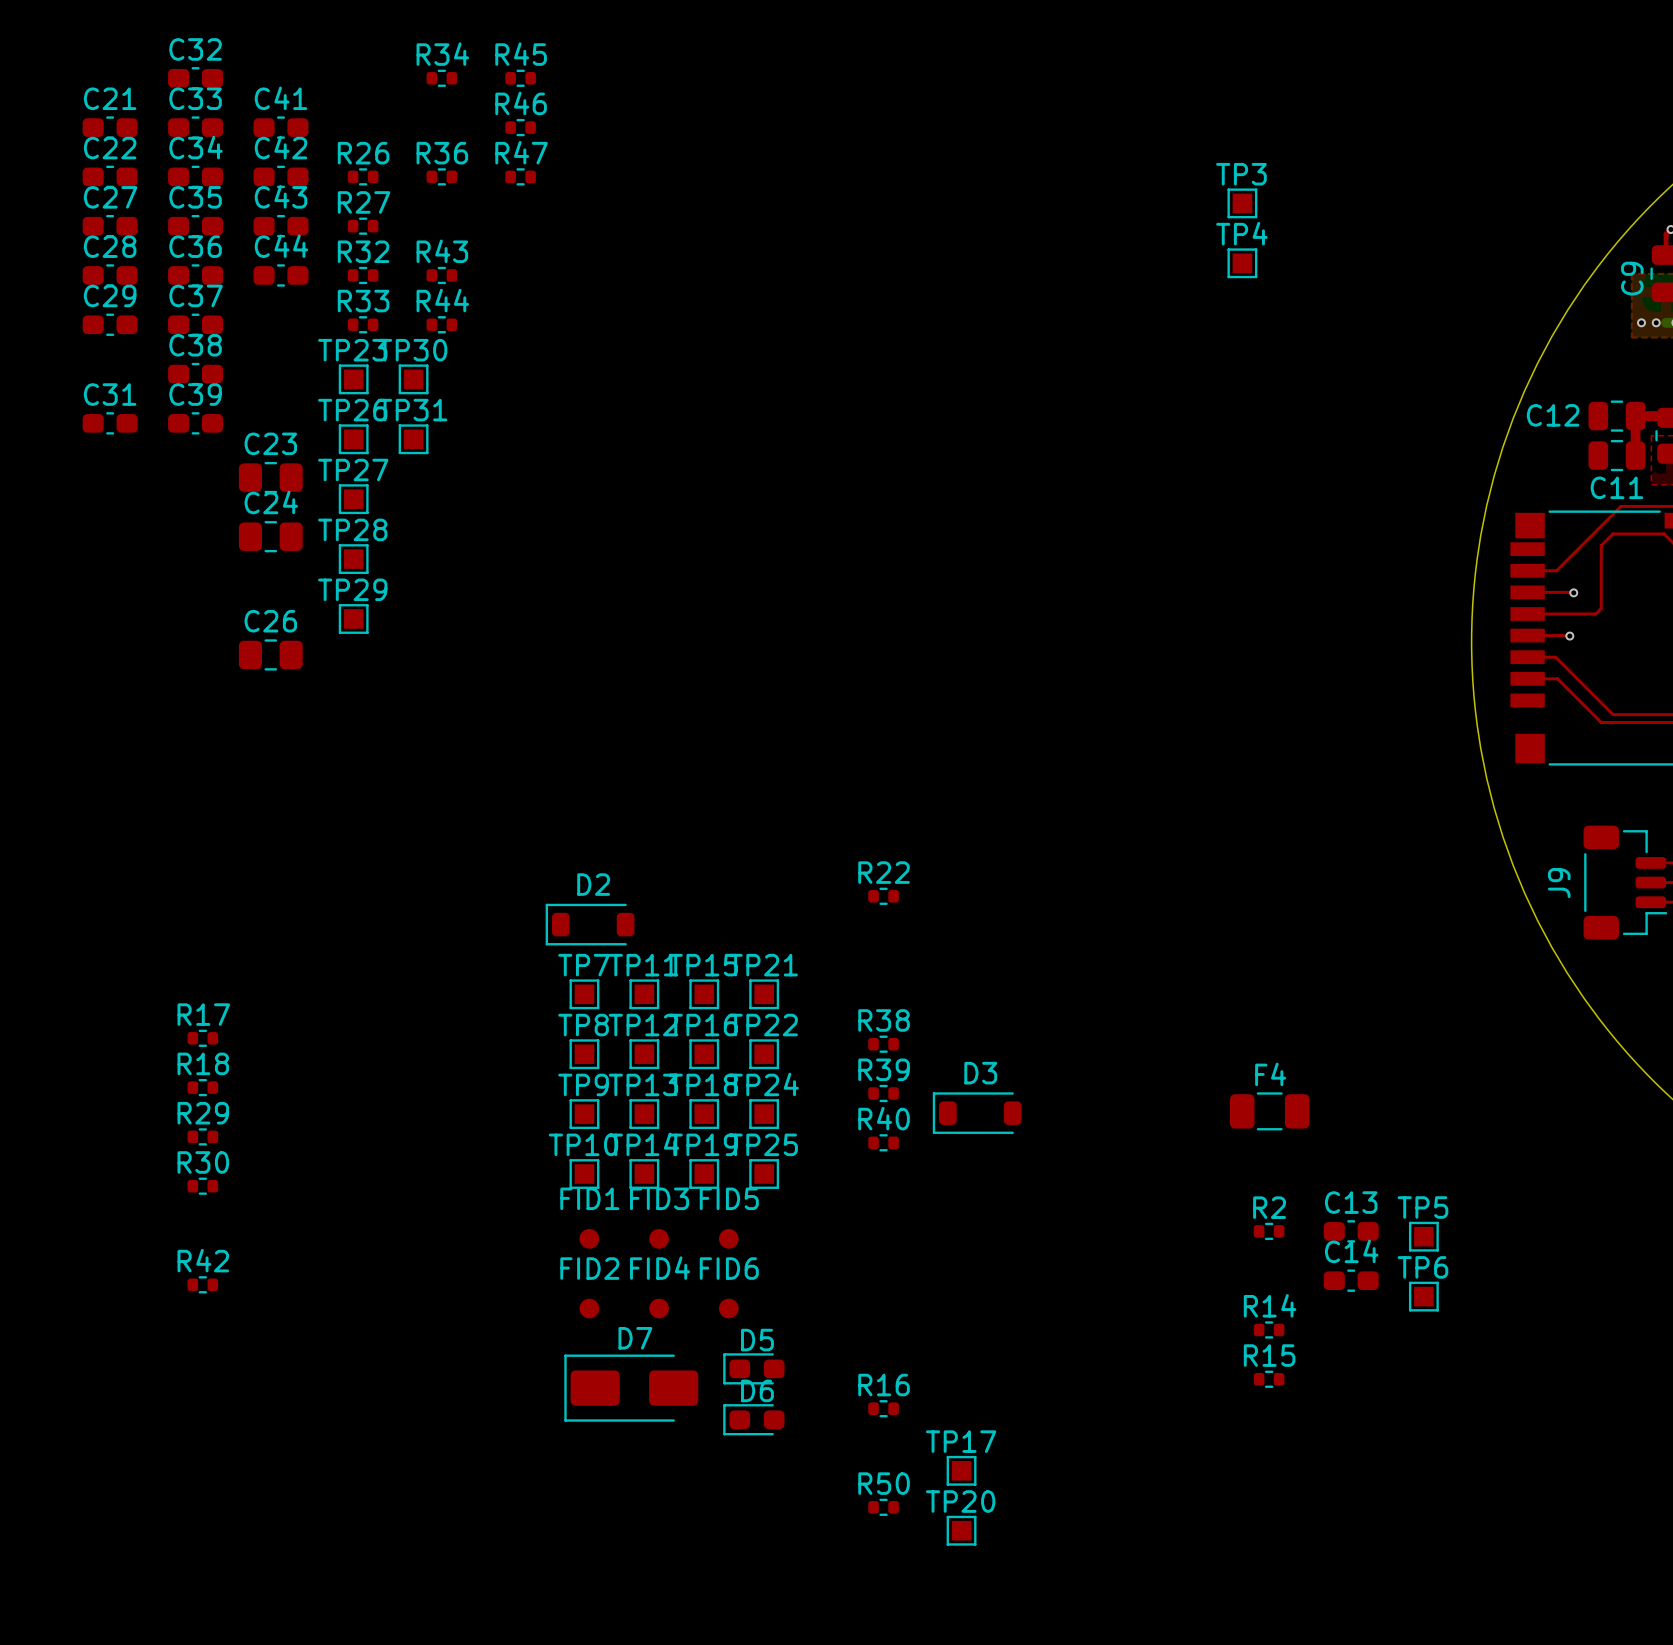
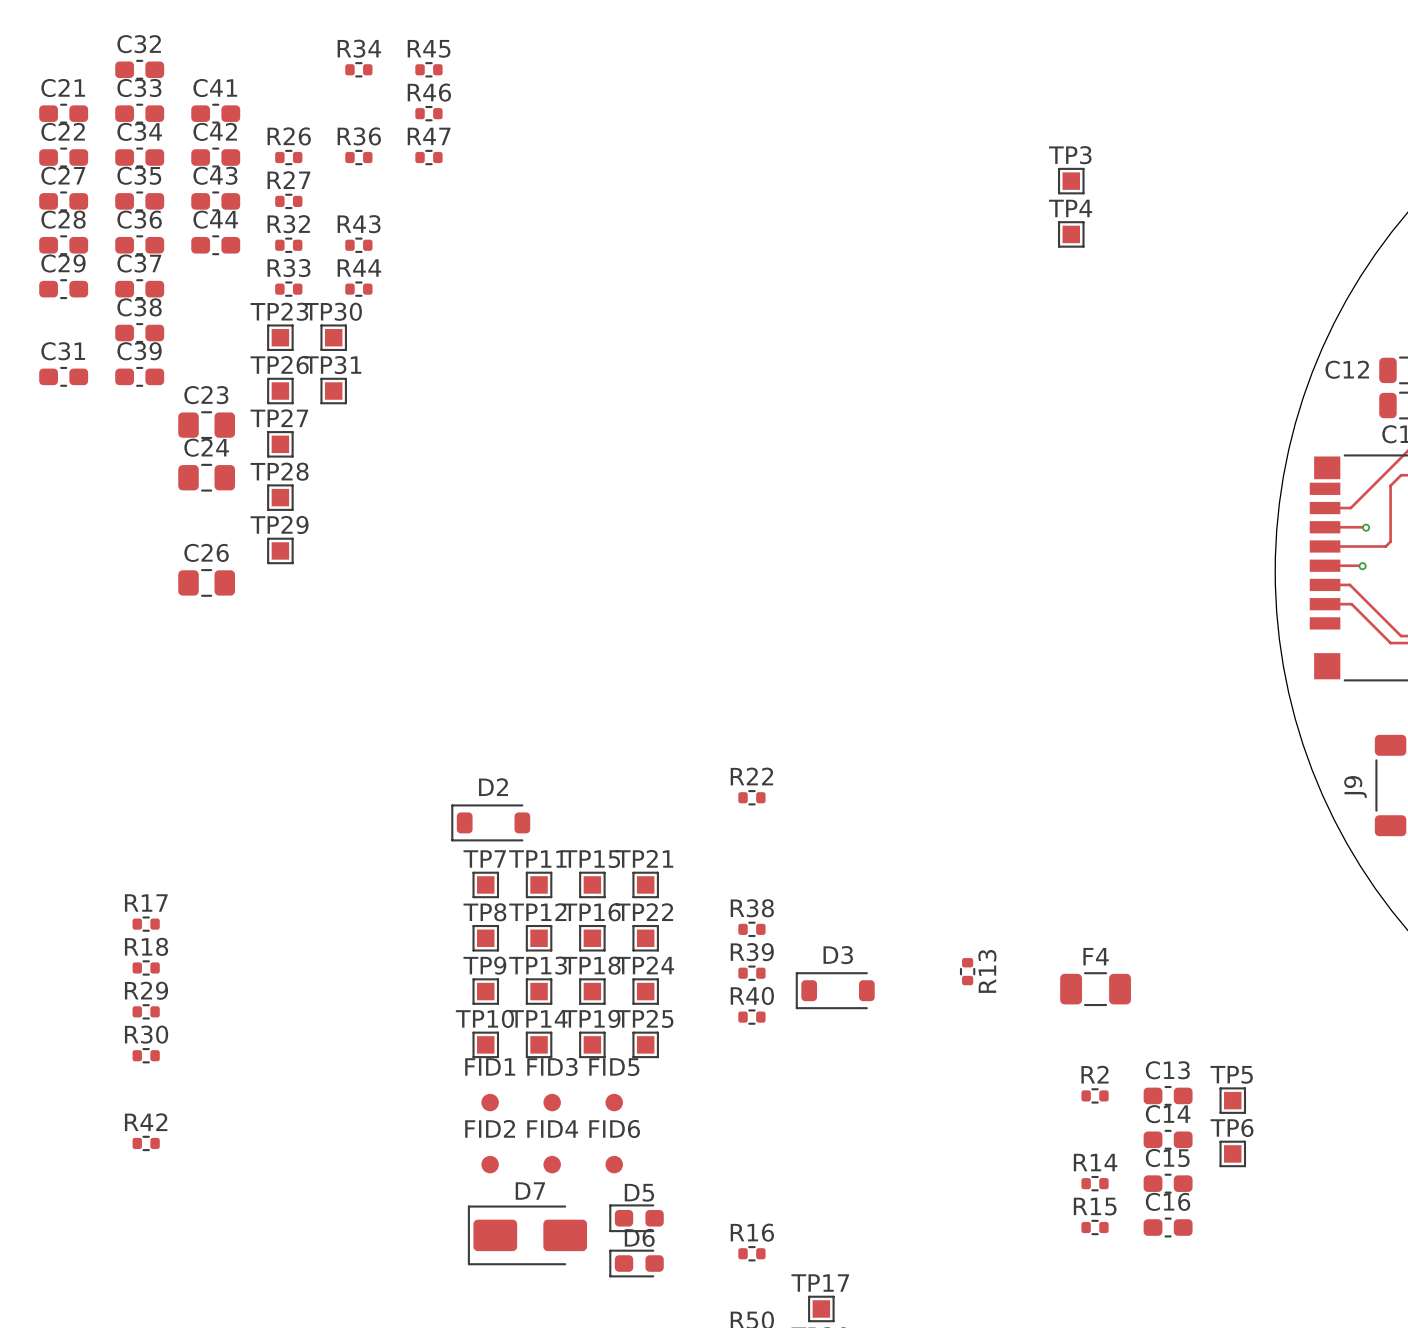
R13: none -> (967, 971)
C15: none -> (1168, 1183)
C16: none -> (1168, 1227)

